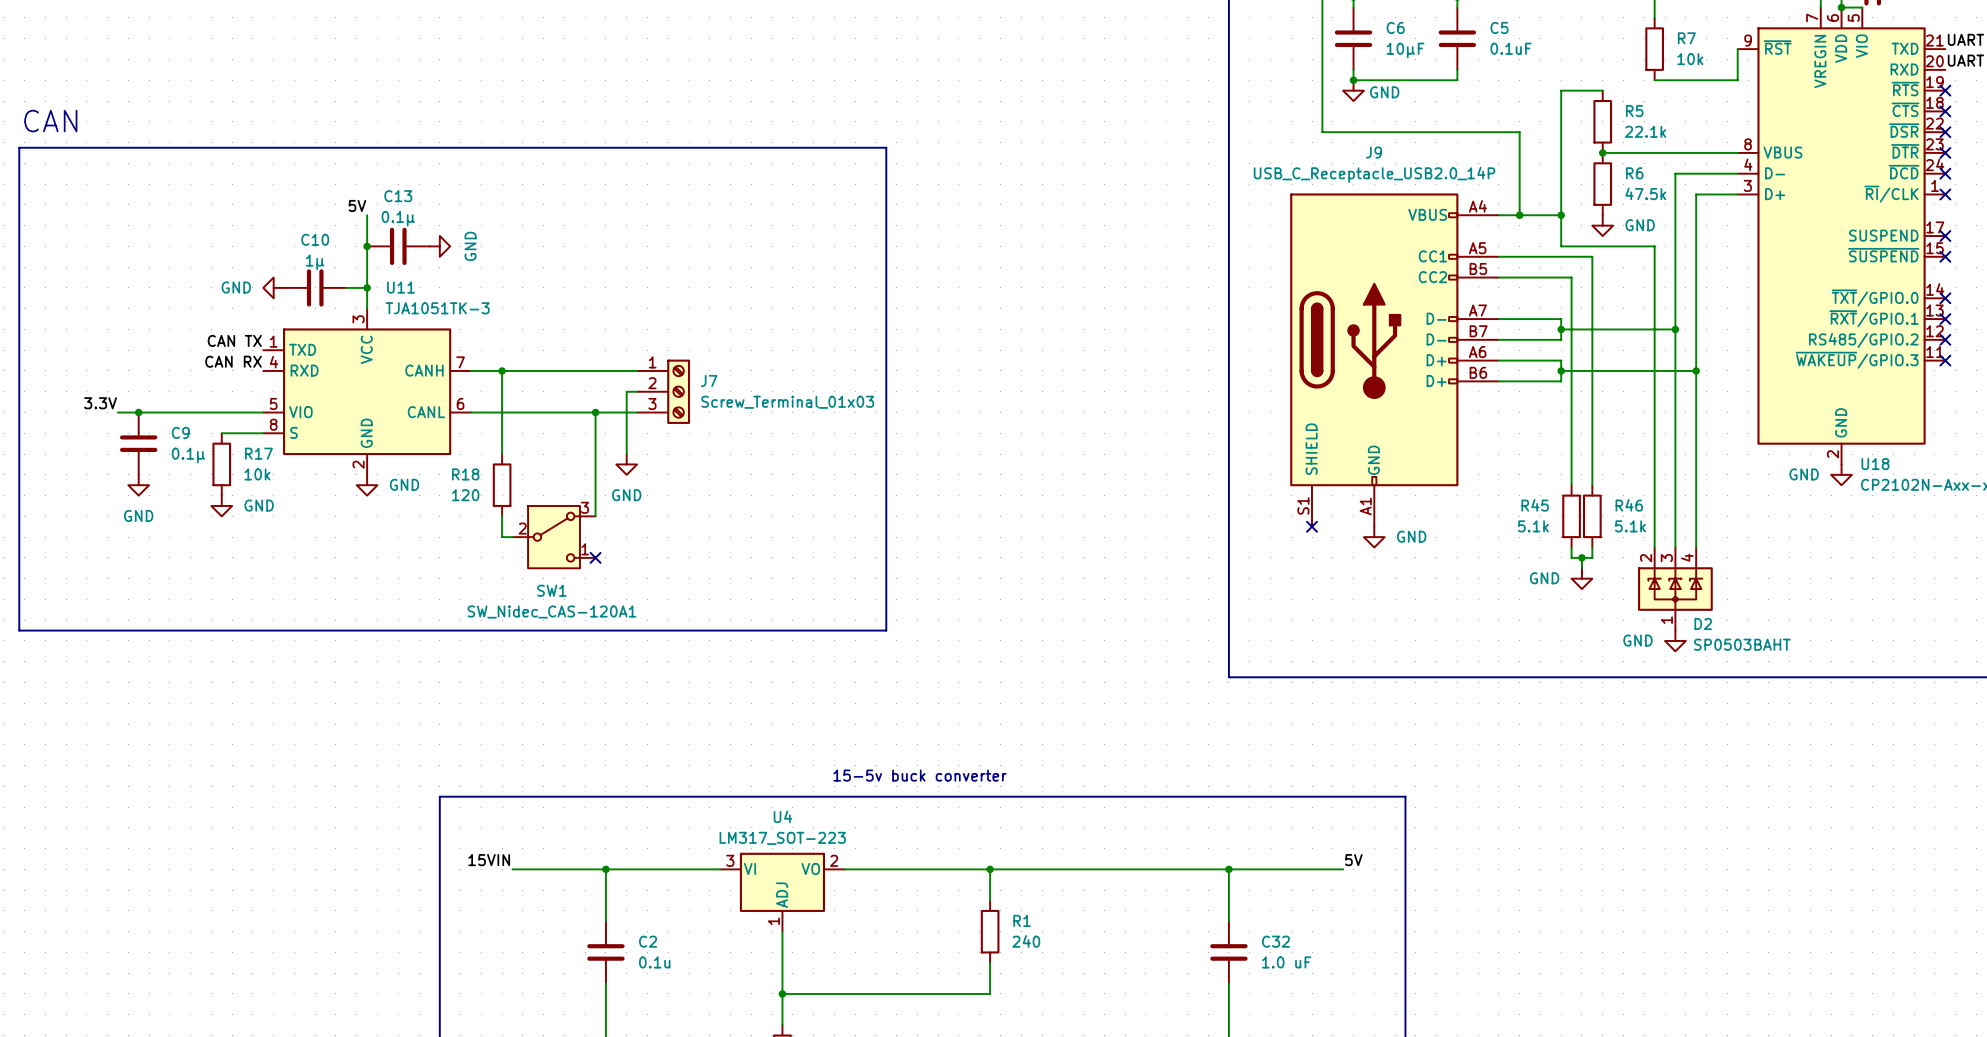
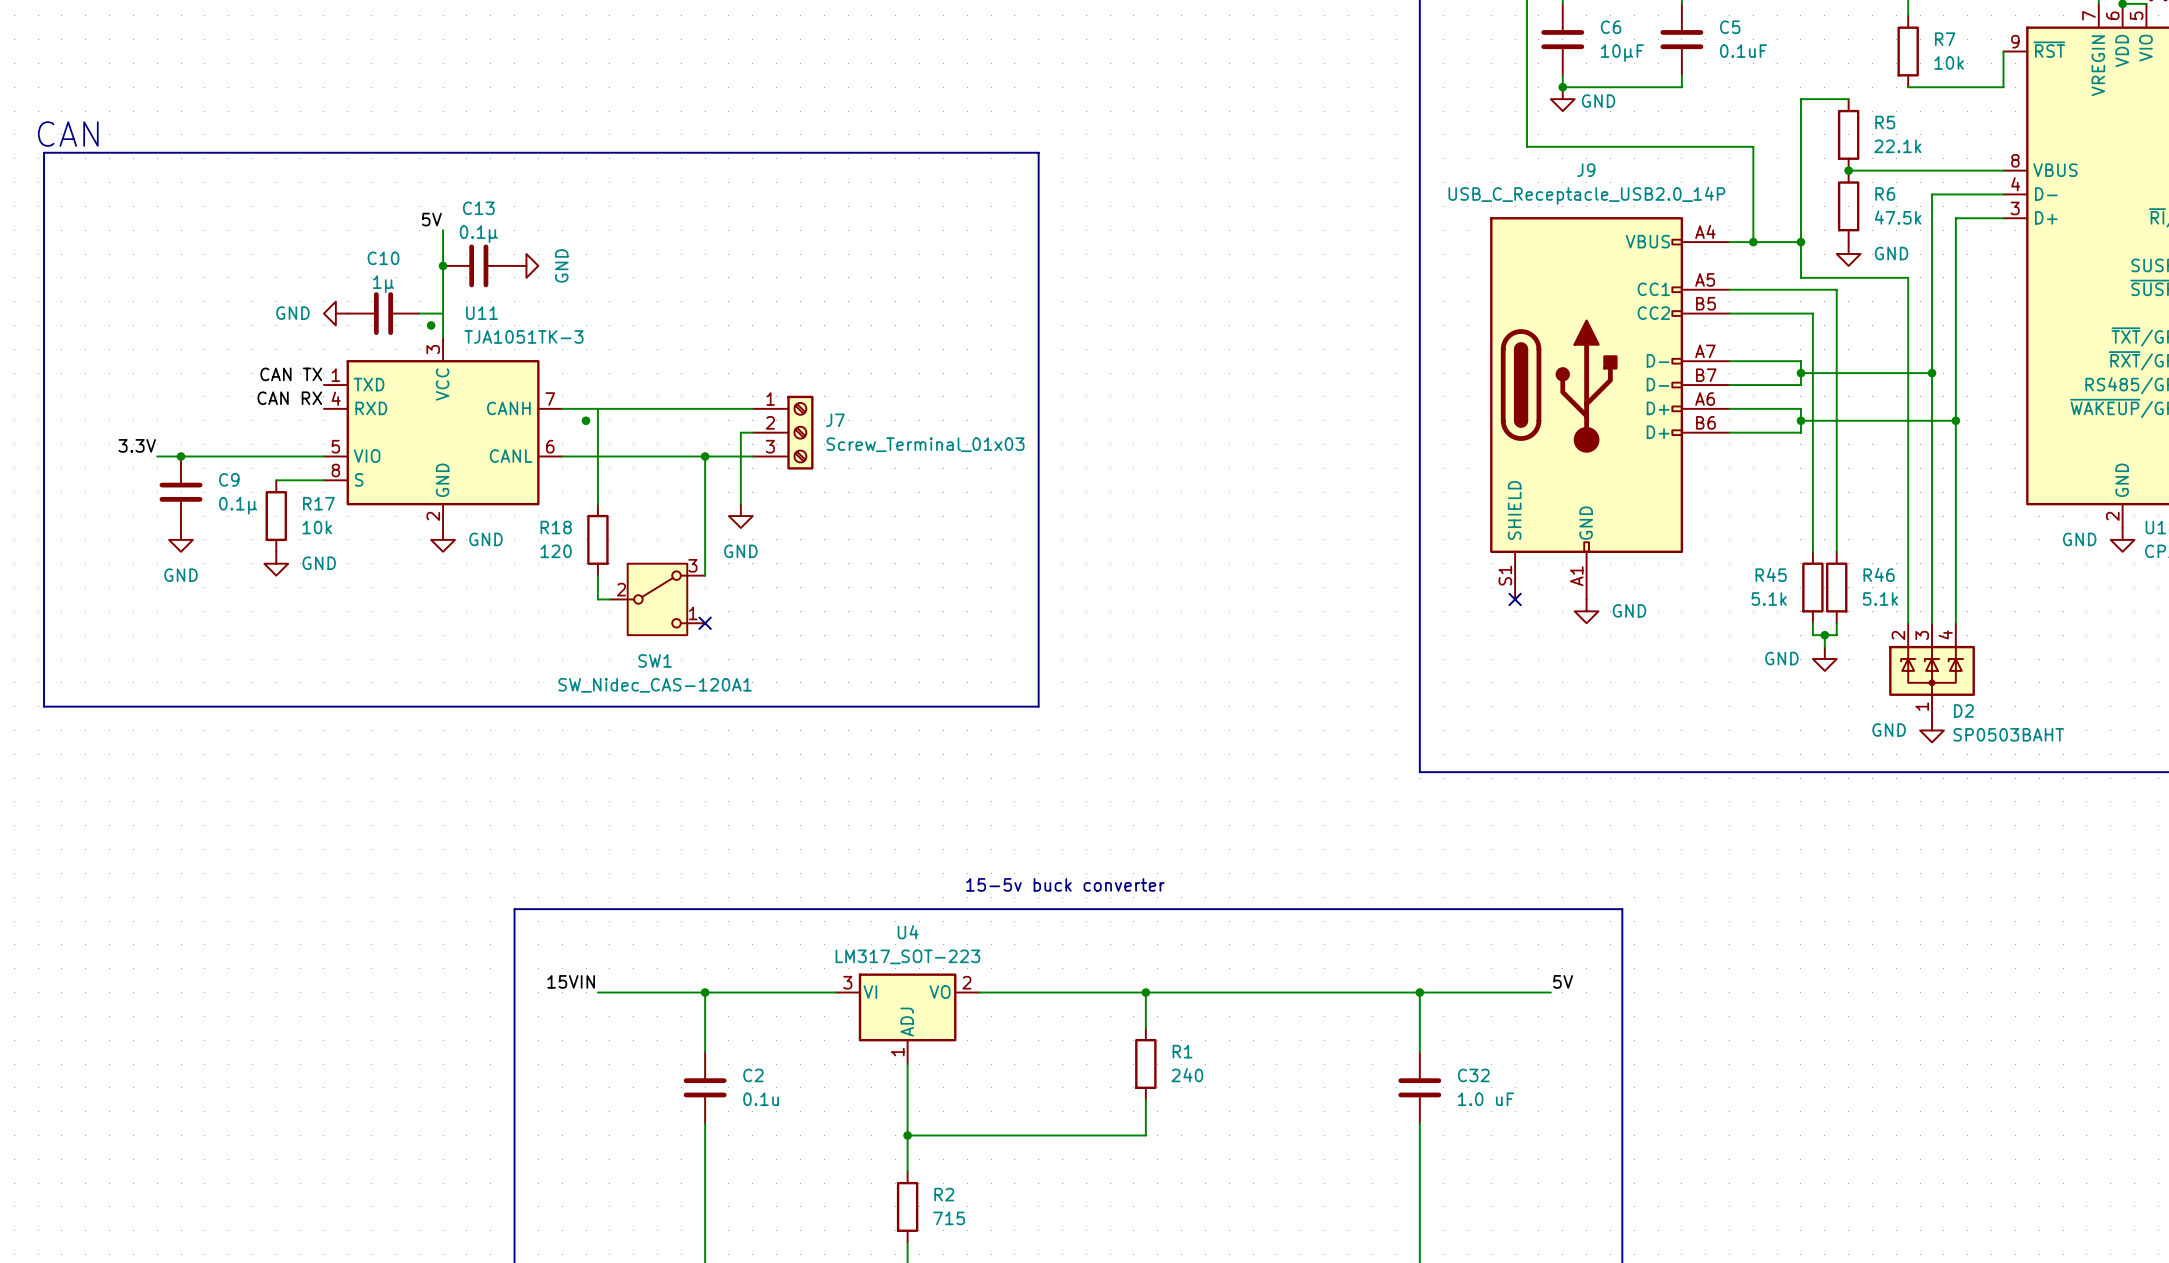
line: (19, 147) (886, 147) (886, 630) (19, 630) (19, 147) -> (44, 152) (1038, 152) (1038, 706) (44, 706) (44, 152)
label position: 5V (357, 205) -> 5V (431, 219)
wire: (367, 215) (367, 308) -> (443, 230) (443, 337)
junction position: (367, 246) -> (443, 265)
C13 position: (398, 246) -> (478, 265)
power symbol position: GND (439, 246) -> GND (526, 265)
power symbol position: GND (273, 287) -> GND (335, 313)
C10 position: (315, 287) -> (383, 313)
wire: (346, 287) (367, 287) -> (419, 313) (443, 313)
label position: CAN TX (234, 340) -> CAN TX (291, 374)
label position: CAN RX (233, 361) -> CAN RX (289, 398)
wire: (470, 370) (637, 370) -> (562, 408) (752, 408)
wire: (502, 370) (502, 454) -> (597, 408) (597, 504)
U11 position: (367, 391) -> (443, 432)
wire: (637, 391) (626, 391) (626, 454) -> (752, 432) (740, 432) (740, 504)
J7 position: (663, 391) -> (783, 432)
label position: 3.3V (100, 403) -> 3.3V (137, 445)
wire: (117, 412) (263, 412) -> (157, 456) (323, 456)
junction position: (138, 412) -> (181, 456)
wire: (470, 412) (637, 412) -> (562, 456) (752, 456)
wire: (595, 412) (595, 516) -> (705, 456) (705, 575)
junction position: (595, 412) -> (705, 456)
wire: (221, 433) (263, 433) -> (276, 480) (323, 480)
C9 position: (138, 443) -> (181, 492)
R17 position: (221, 464) -> (276, 516)
power symbol position: GND (626, 464) -> GND (740, 516)
power symbol position: GND (138, 485) -> GND (181, 539)
power symbol position: GND (367, 485) -> GND (443, 539)
R18 position: (502, 485) -> (597, 539)
power symbol position: GND (221, 505) -> GND (276, 563)
wire: (502, 516) (502, 537) (512, 537) -> (597, 575) (597, 599) (609, 599)
SW1 position: (554, 537) -> (657, 599)
no-connect mark position: (595, 557) -> (705, 623)

